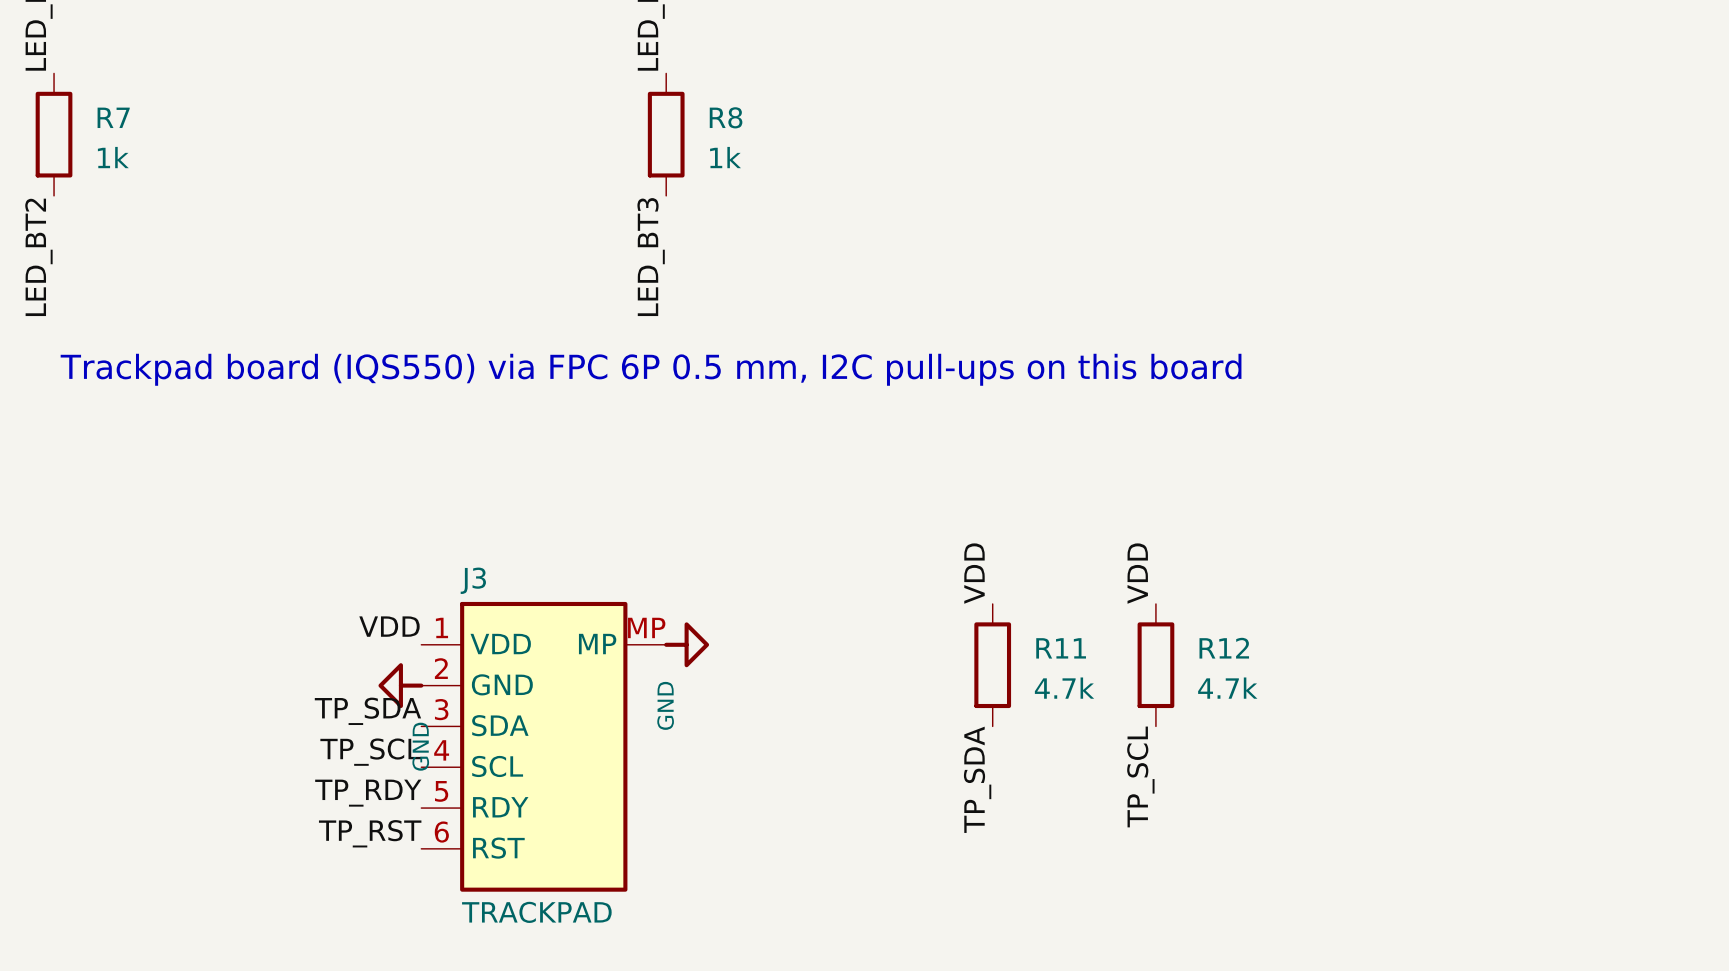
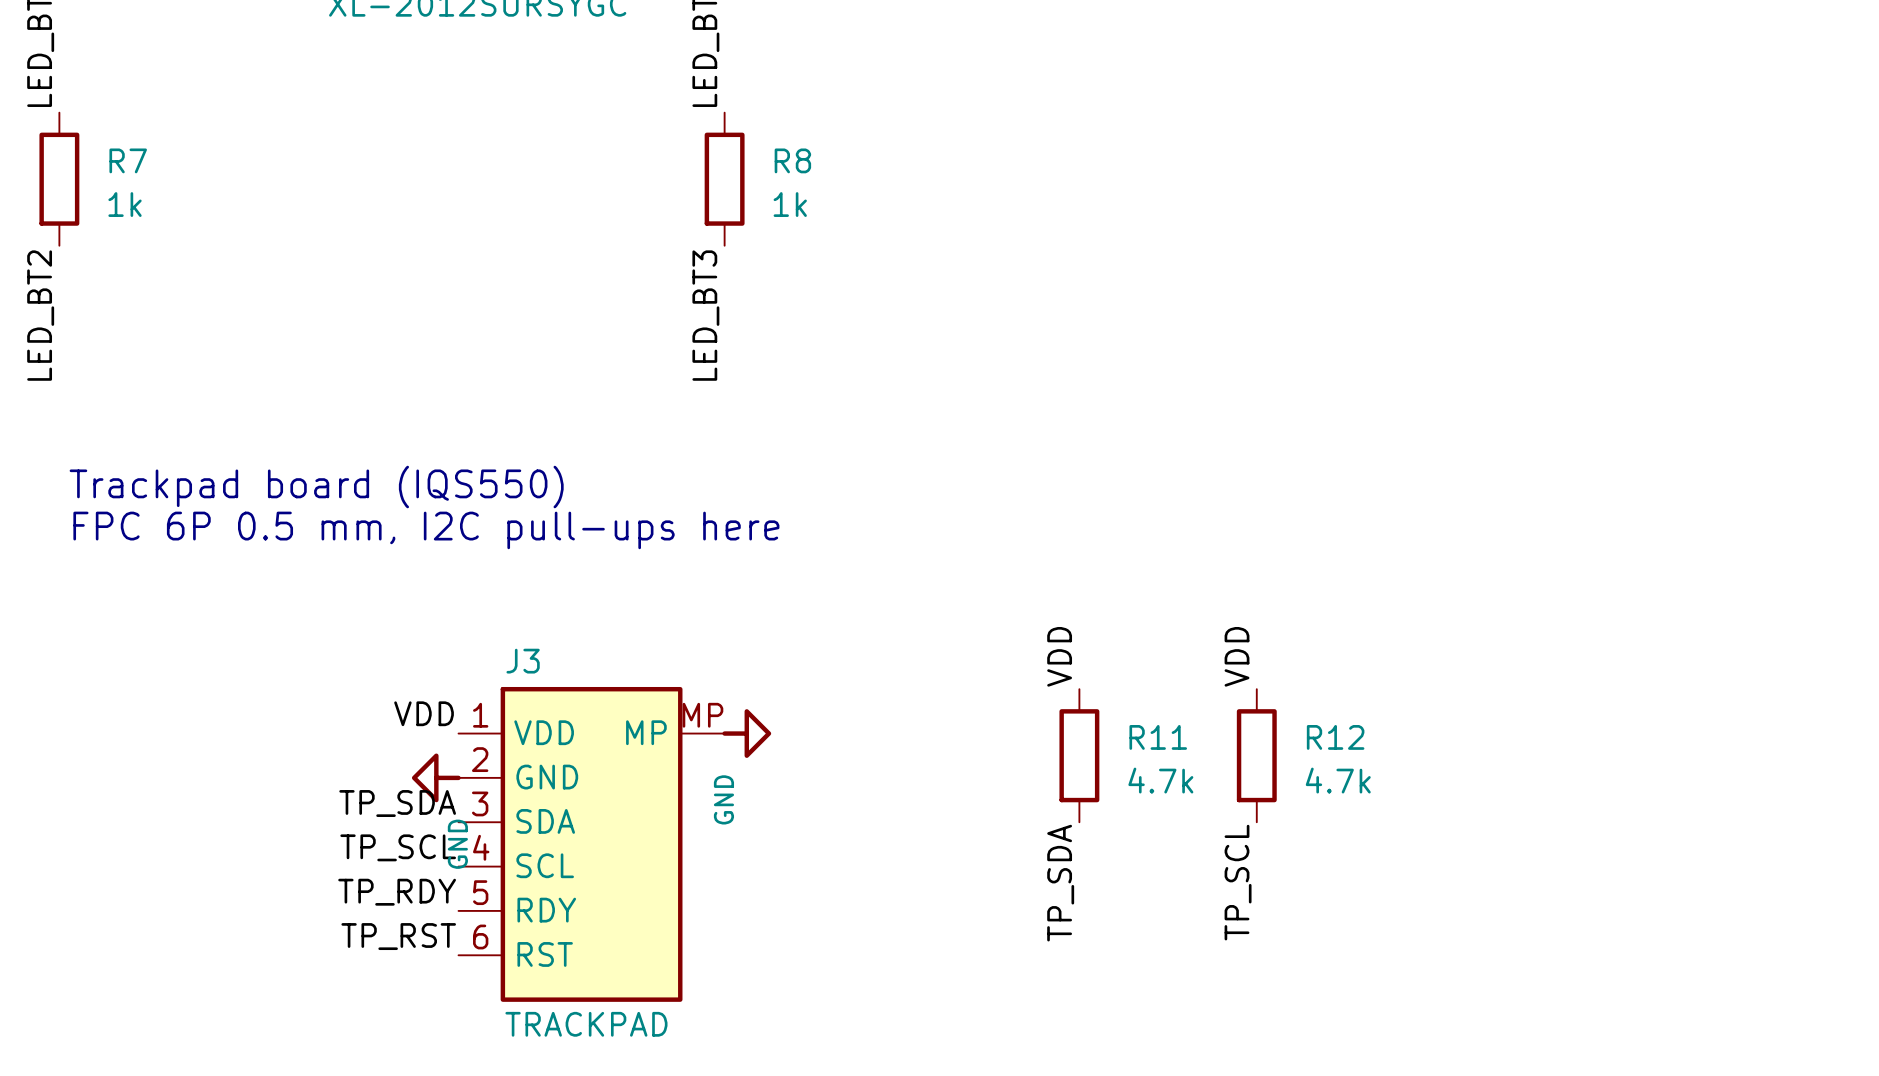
text: Trackpad board (IQS550) via FPC 6P 0.5 mm, I2C pull-ups on this board (651, 369) -> none
text: none -> Trackpad board (IQS550) (316, 487)
text: none -> FPC 6P 0.5 mm, I2C pull-ups here (426, 530)

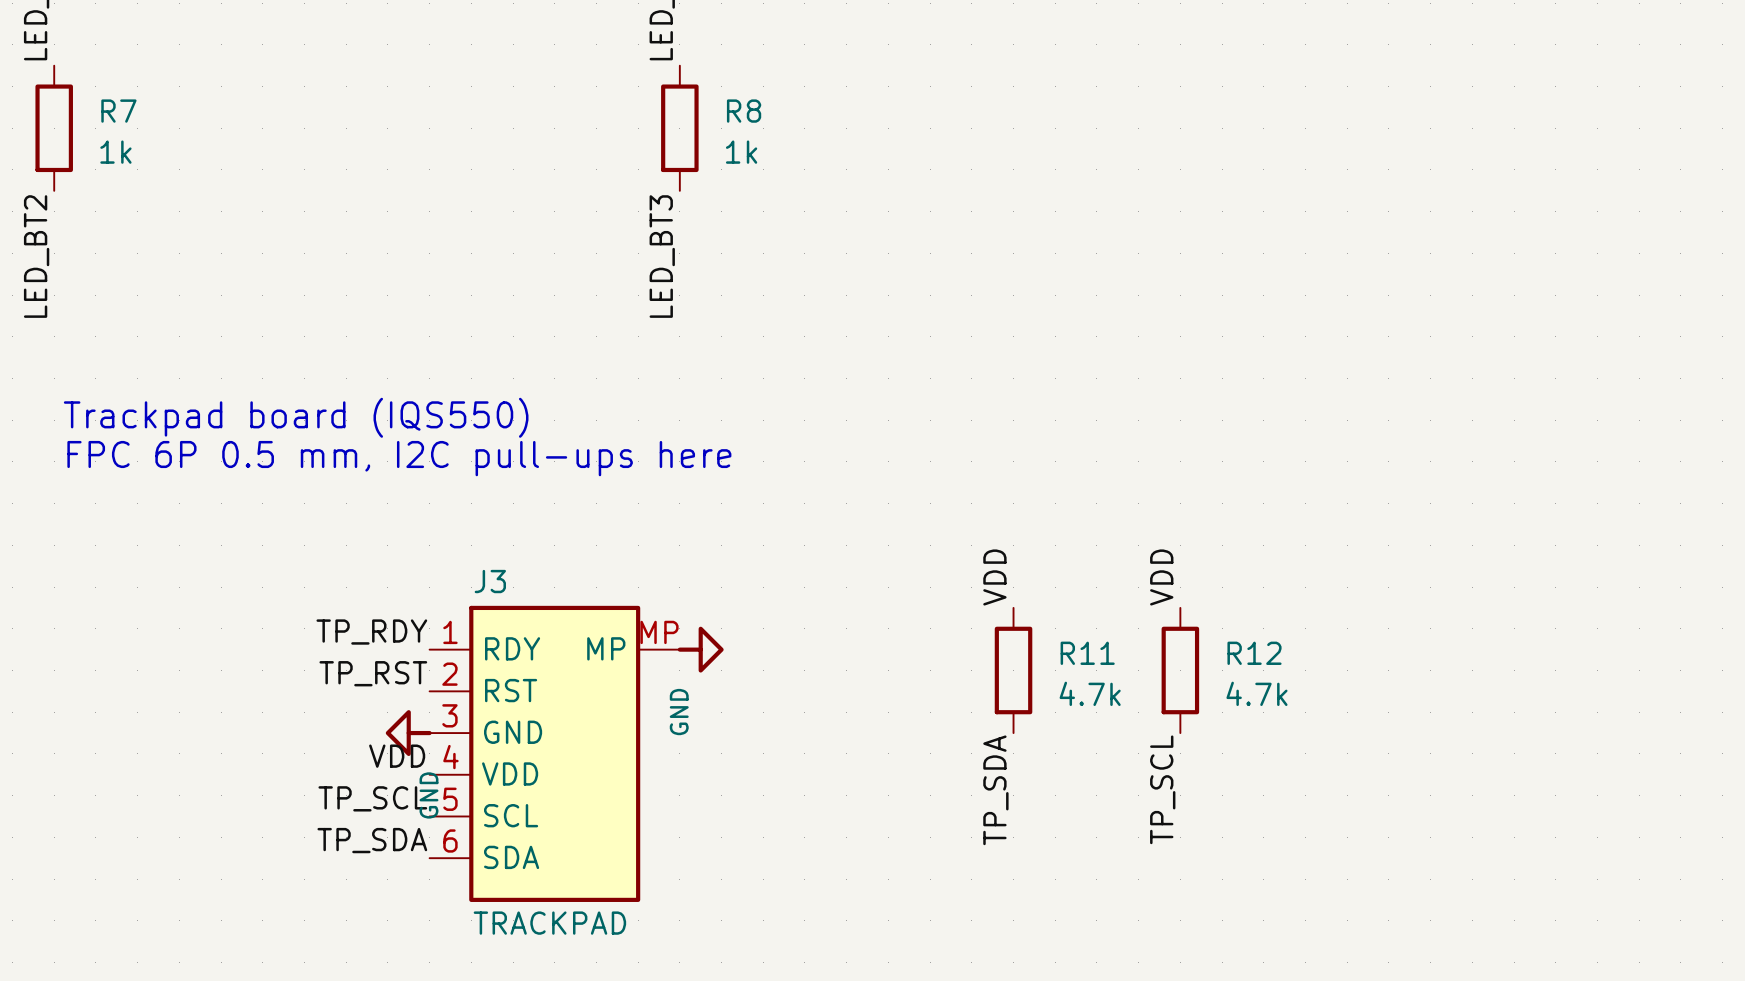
label: VDD (424, 713) -> TP_RDY (371, 632)
J3 pin name: VDD (544, 732) -> RDY (512, 648)
power symbol position: GND (436, 777) -> GND (408, 733)
J3 pin name: GND (547, 777) -> RST (511, 690)
label: TP_SDA (397, 803) -> TP_RST (373, 673)
J3 pin name: SDA (545, 821) -> GND (513, 732)
label: TP_SCL (398, 847) -> VDD (397, 756)
J3 pin name: SCL (545, 865) -> VDD (510, 773)
label: TP_RDY (397, 892) -> TP_SCL (372, 798)
J3 pin name: RDY (546, 910) -> SCL (511, 815)
label: TP_RST (398, 936) -> TP_SDA (372, 840)
J3 pin name: RST (545, 954) -> SDA (511, 857)

